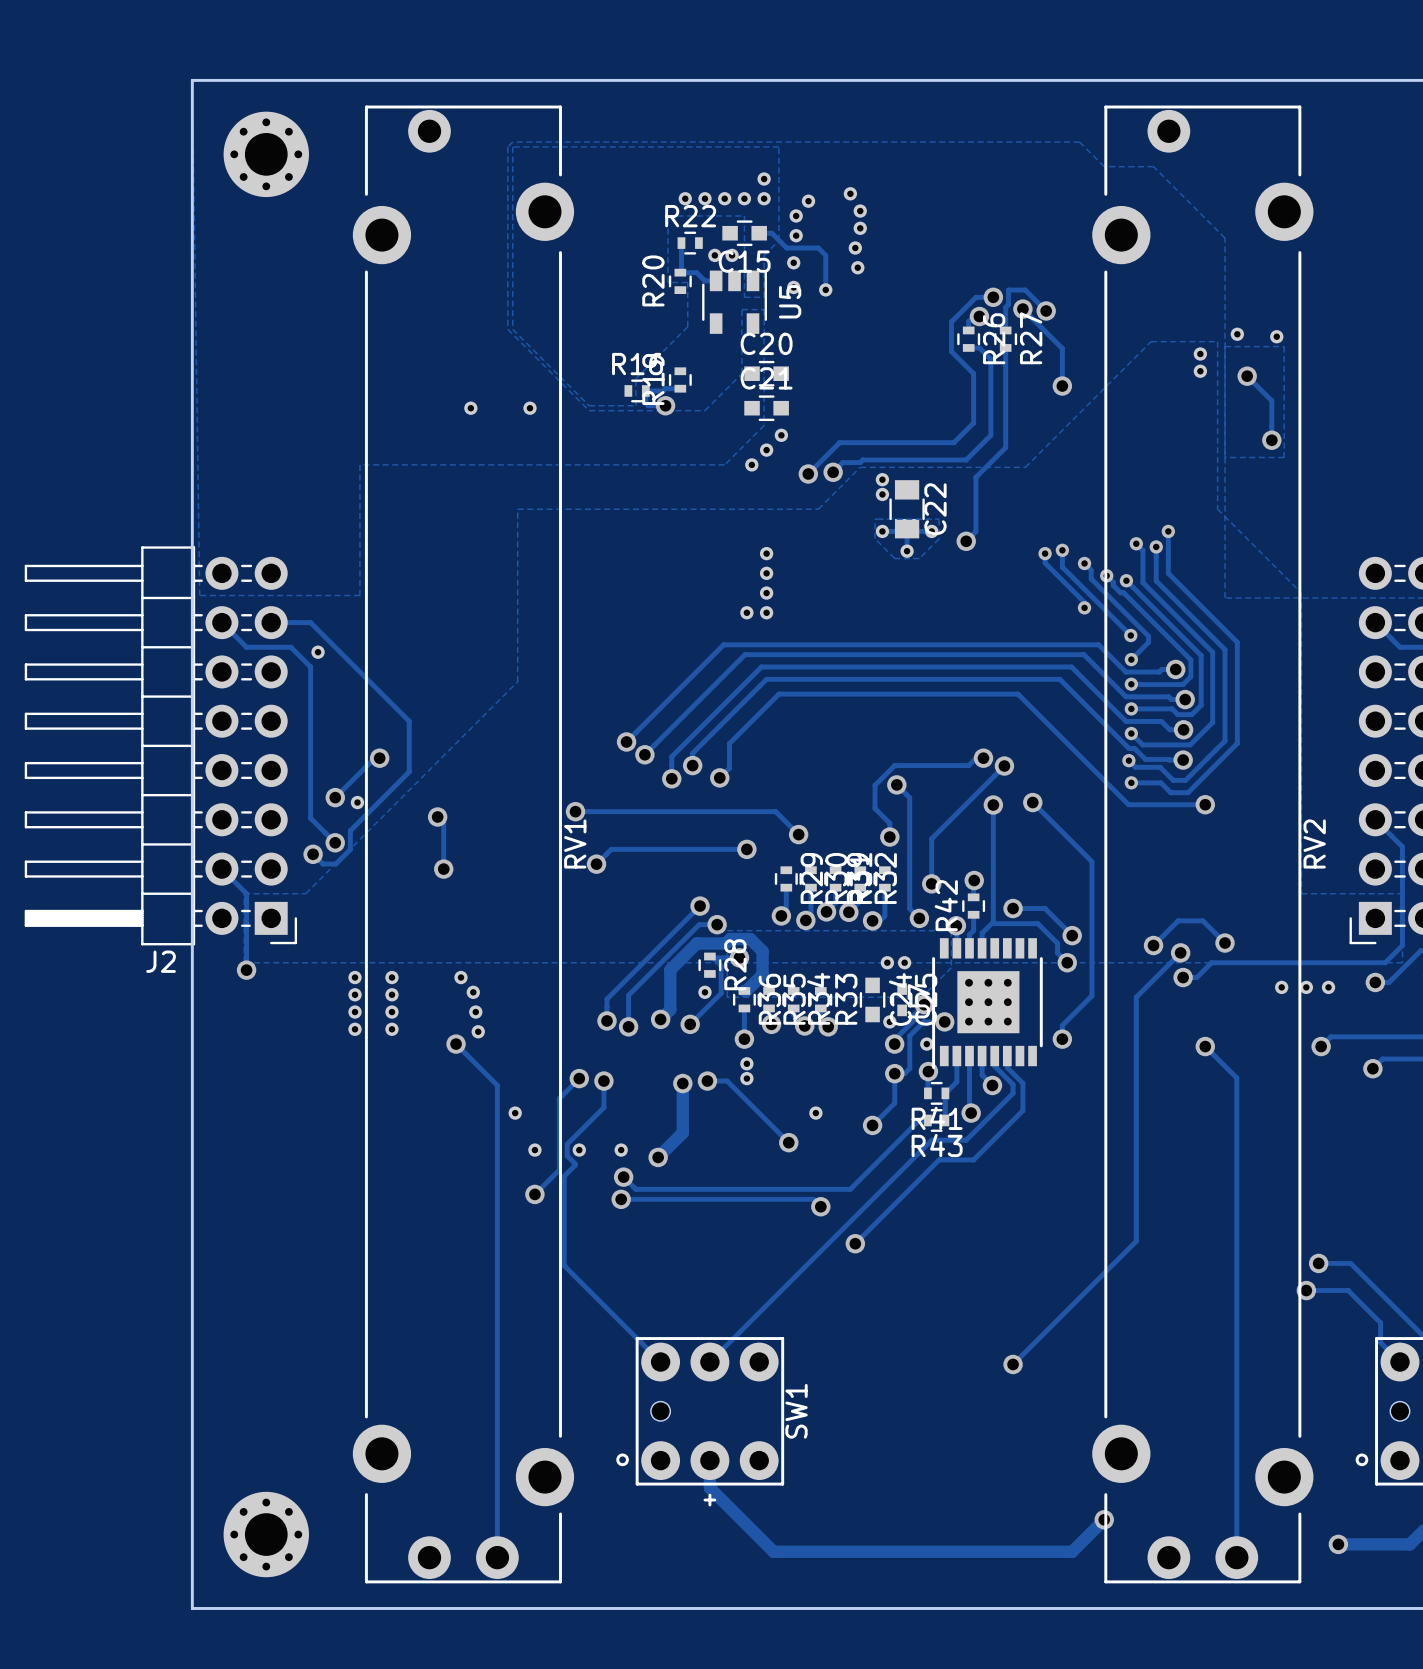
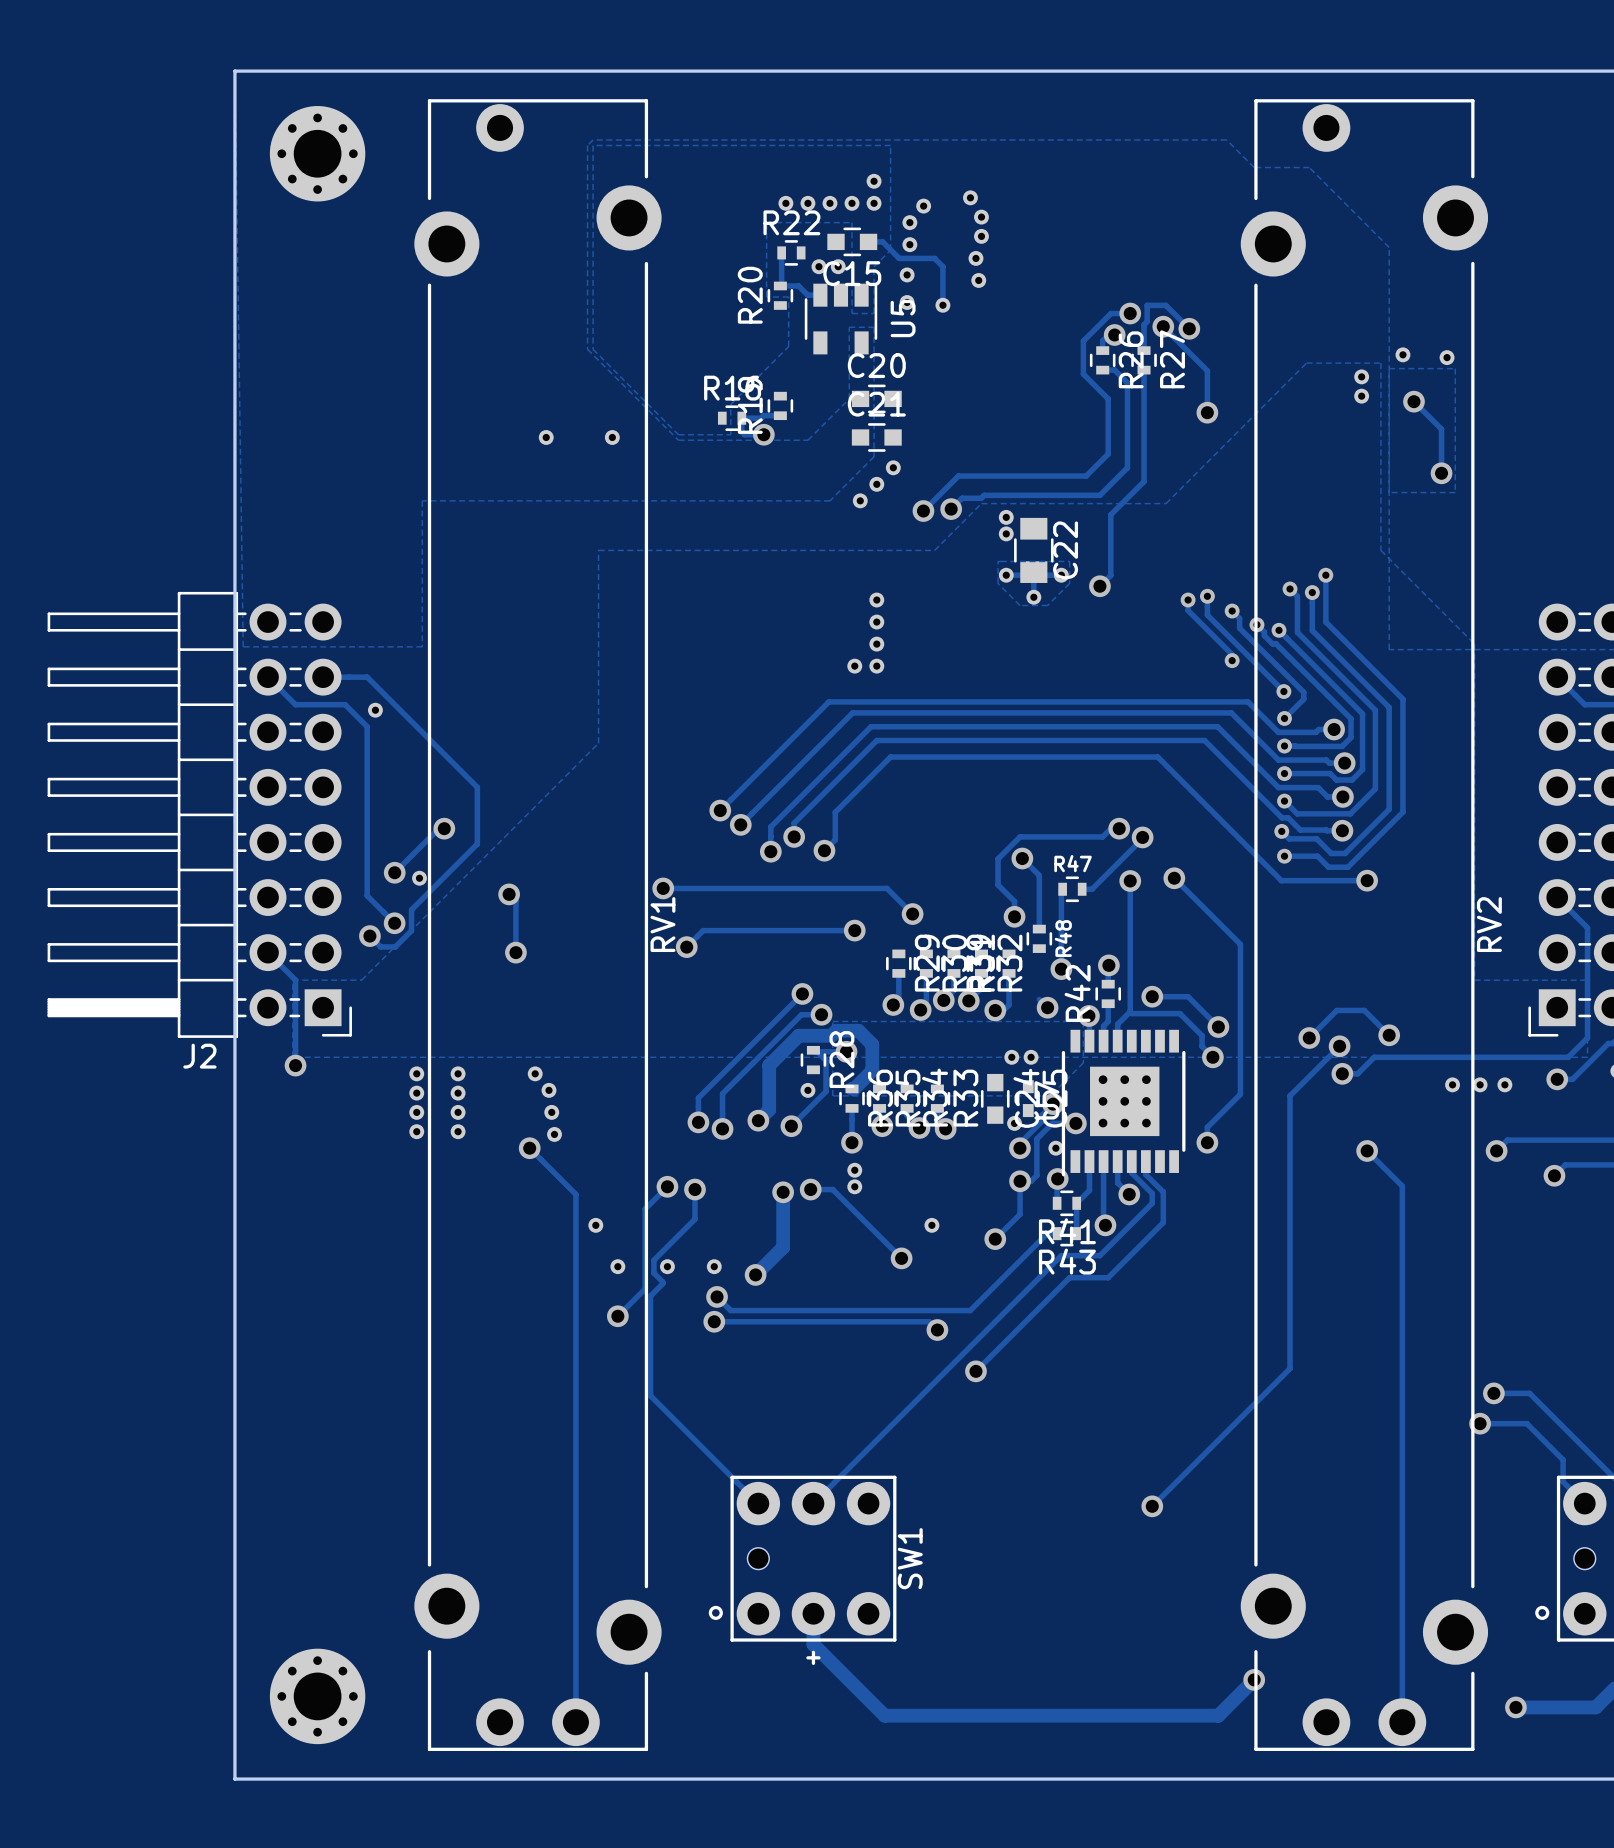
track: (1004, 766) (931, 838) -> (1142, 837) (1092, 889) (1082, 889)
track: (909, 797) (909, 908) (912, 910) -> (1036, 872) (1039, 875) (1039, 929)
track: none -> (1062, 889) (1061, 918)
R47: none -> (1072, 889)
R48: none -> (1039, 938)

